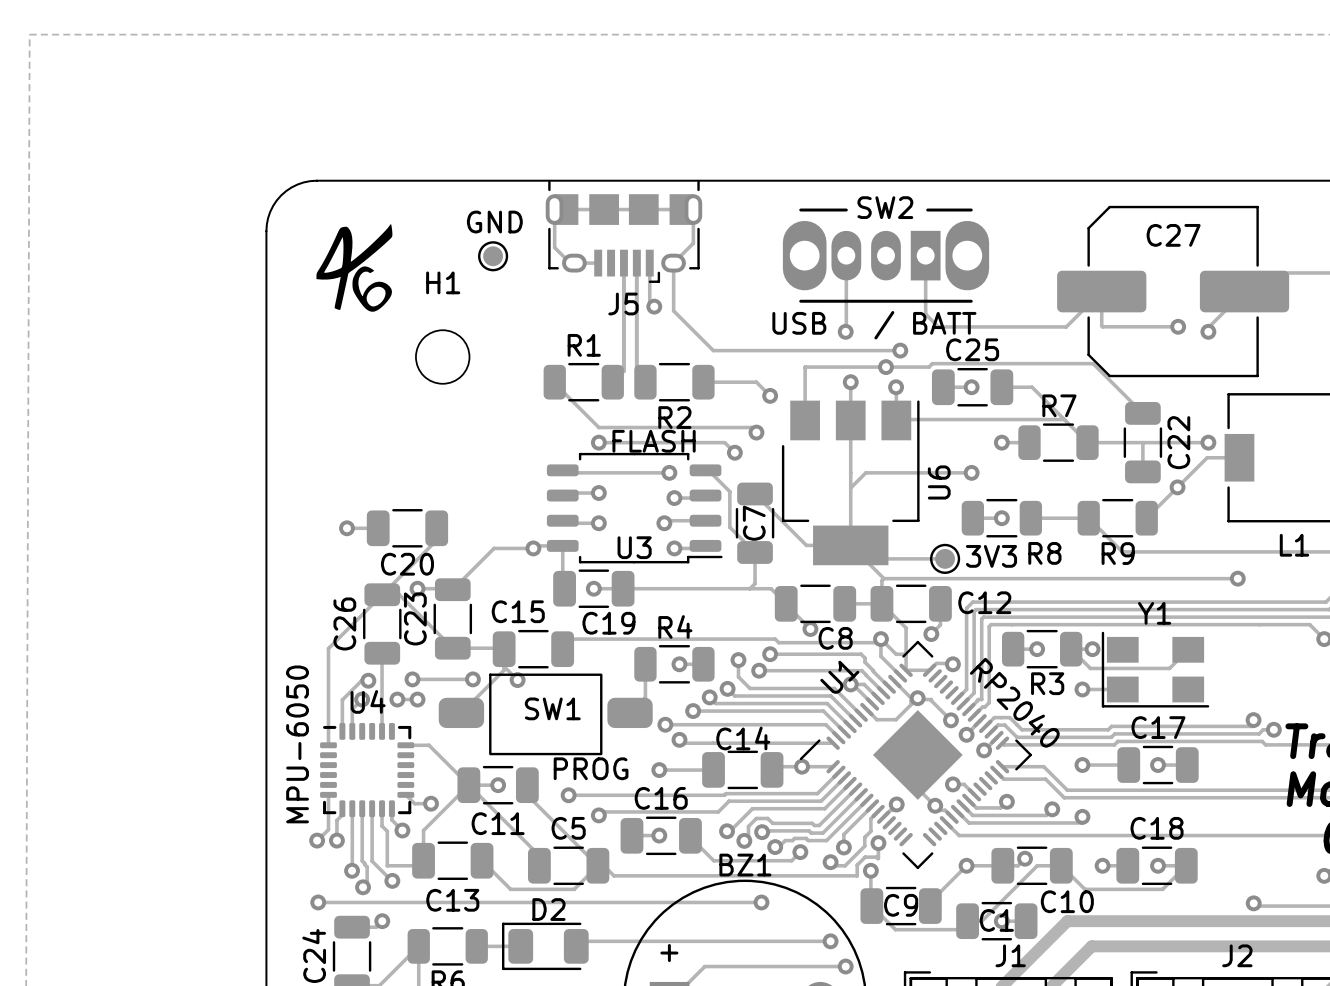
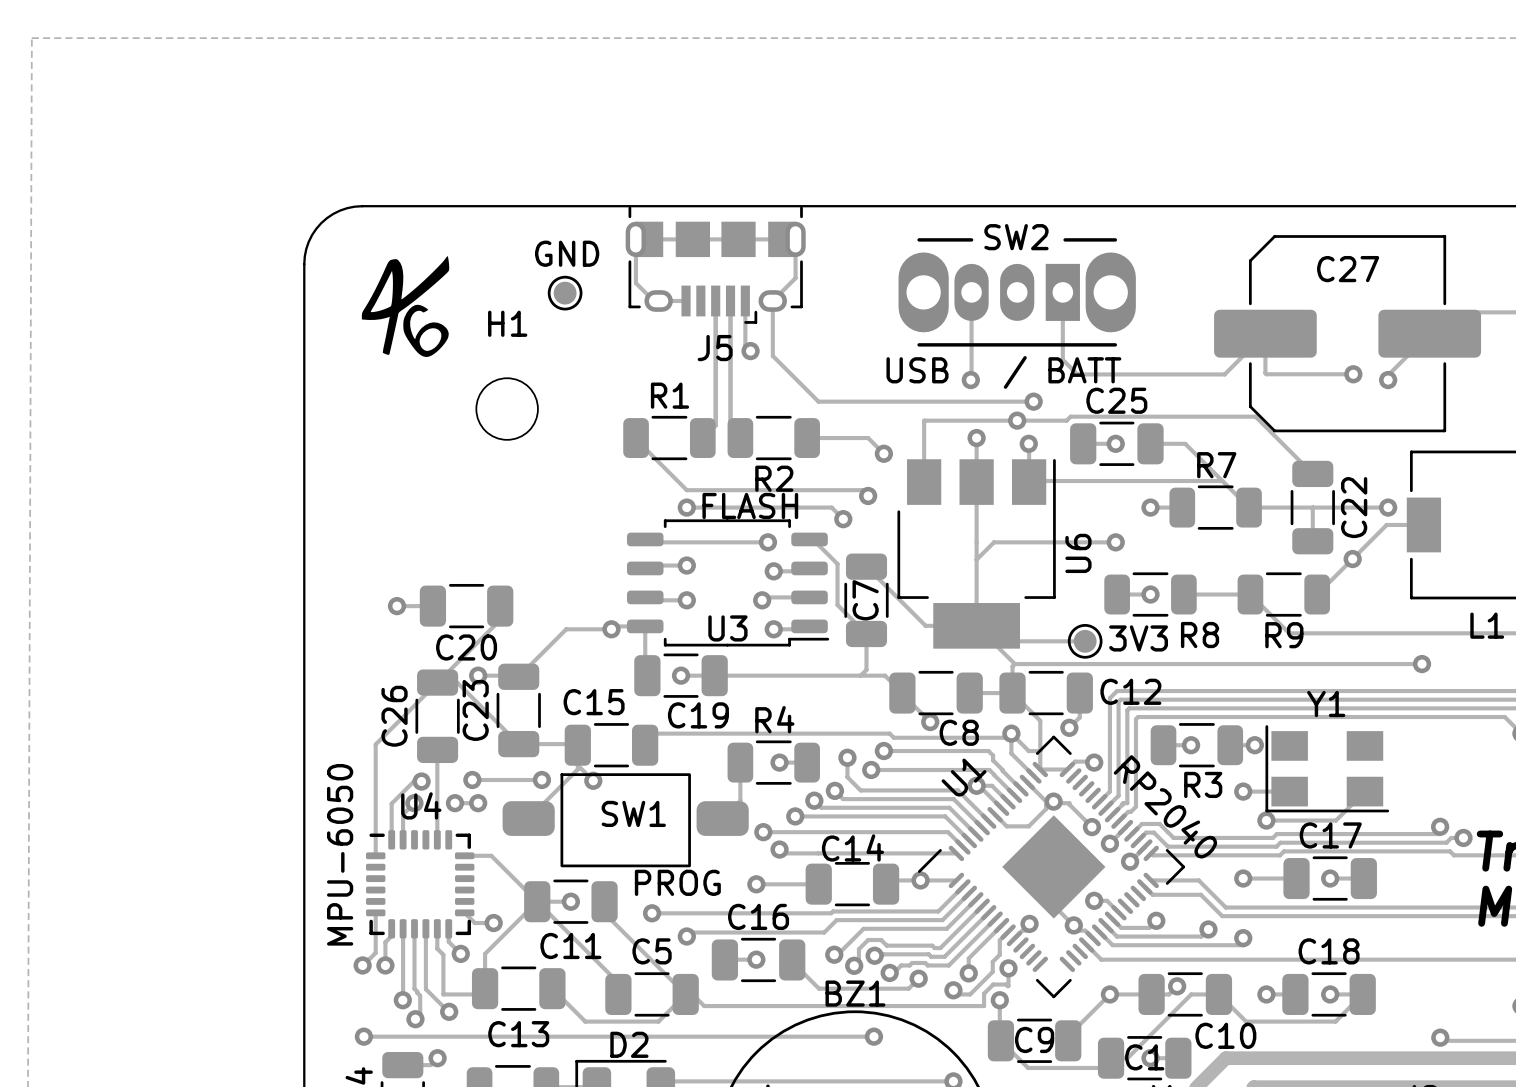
track: (1071, 649) (1090, 668) (1169, 668) (1188, 649) (1185, 649) -> none
track: none -> (1364, 791) (1335, 820) (1266, 820)
via: none -> (1266, 820)

